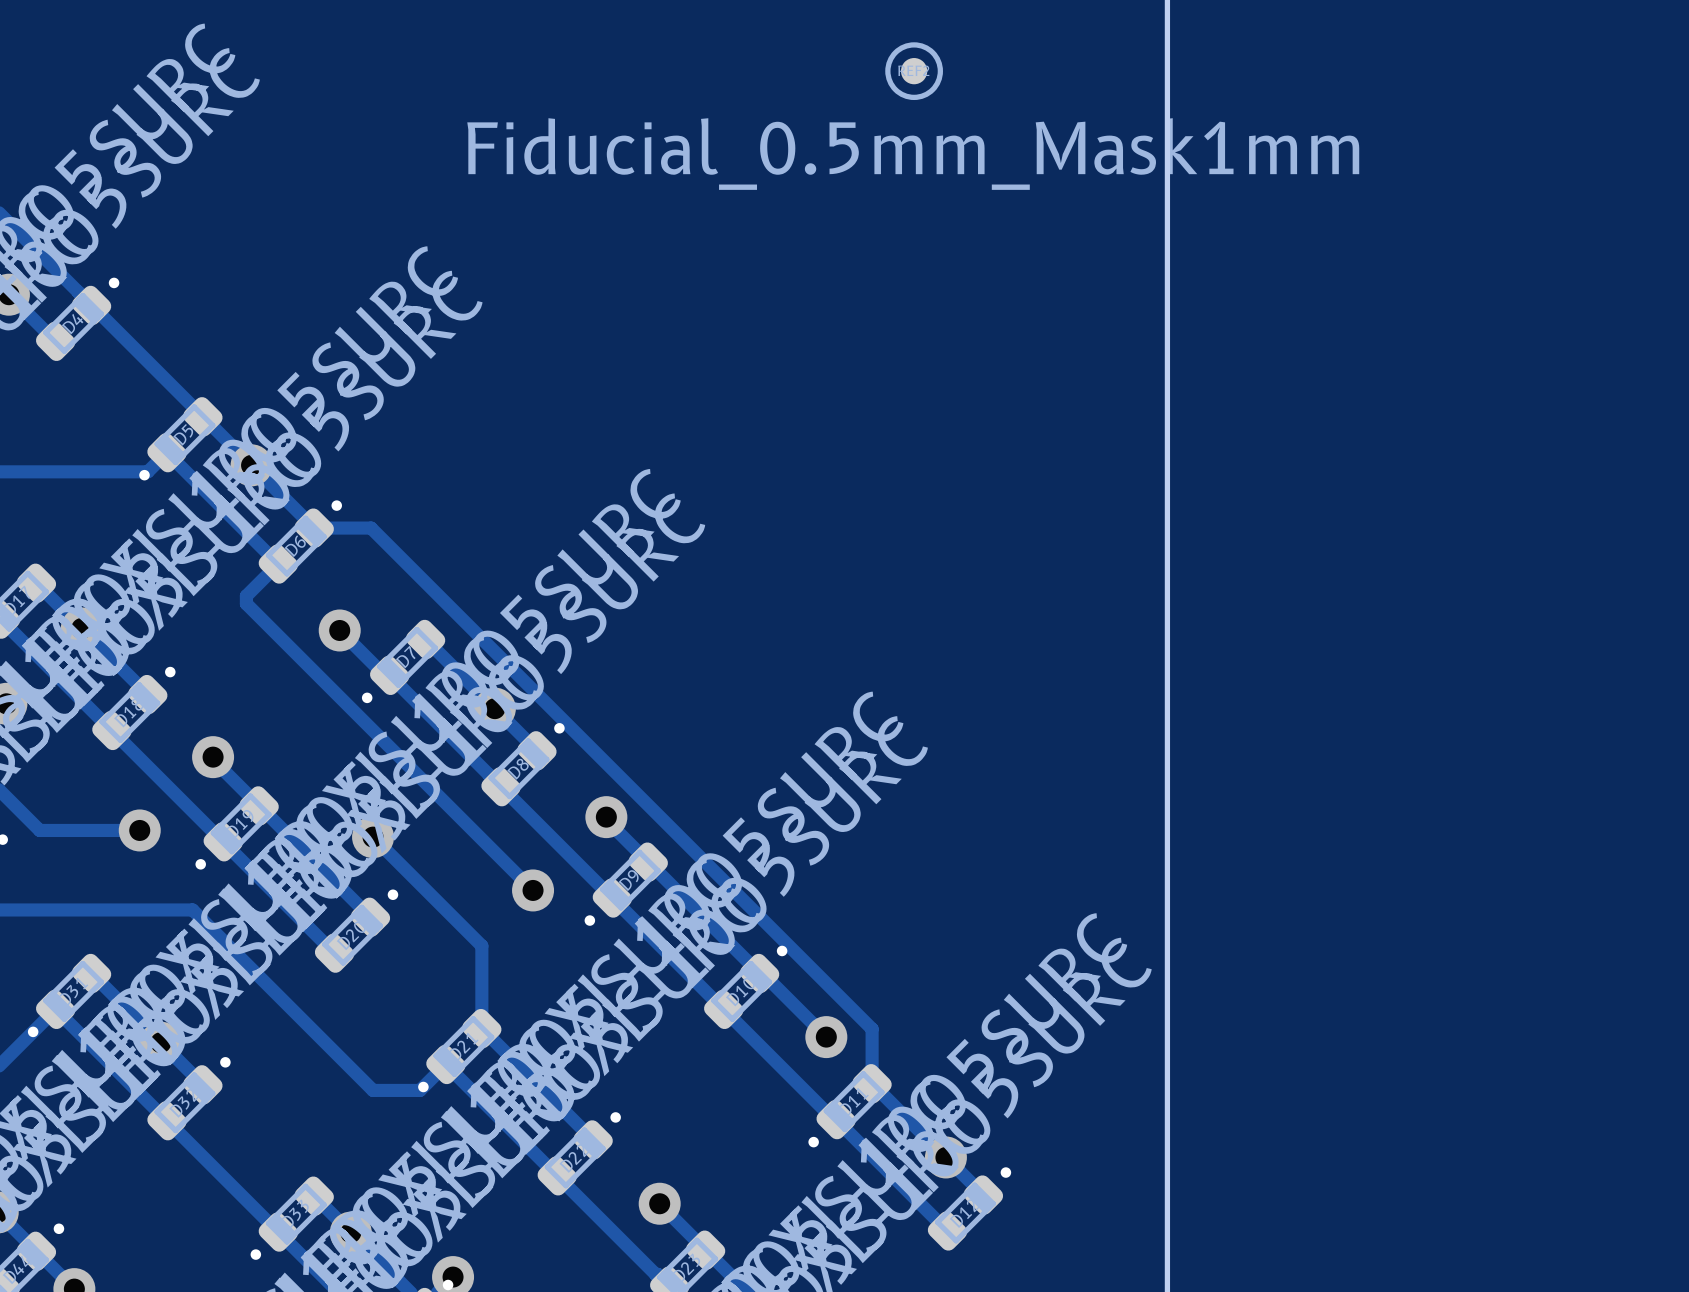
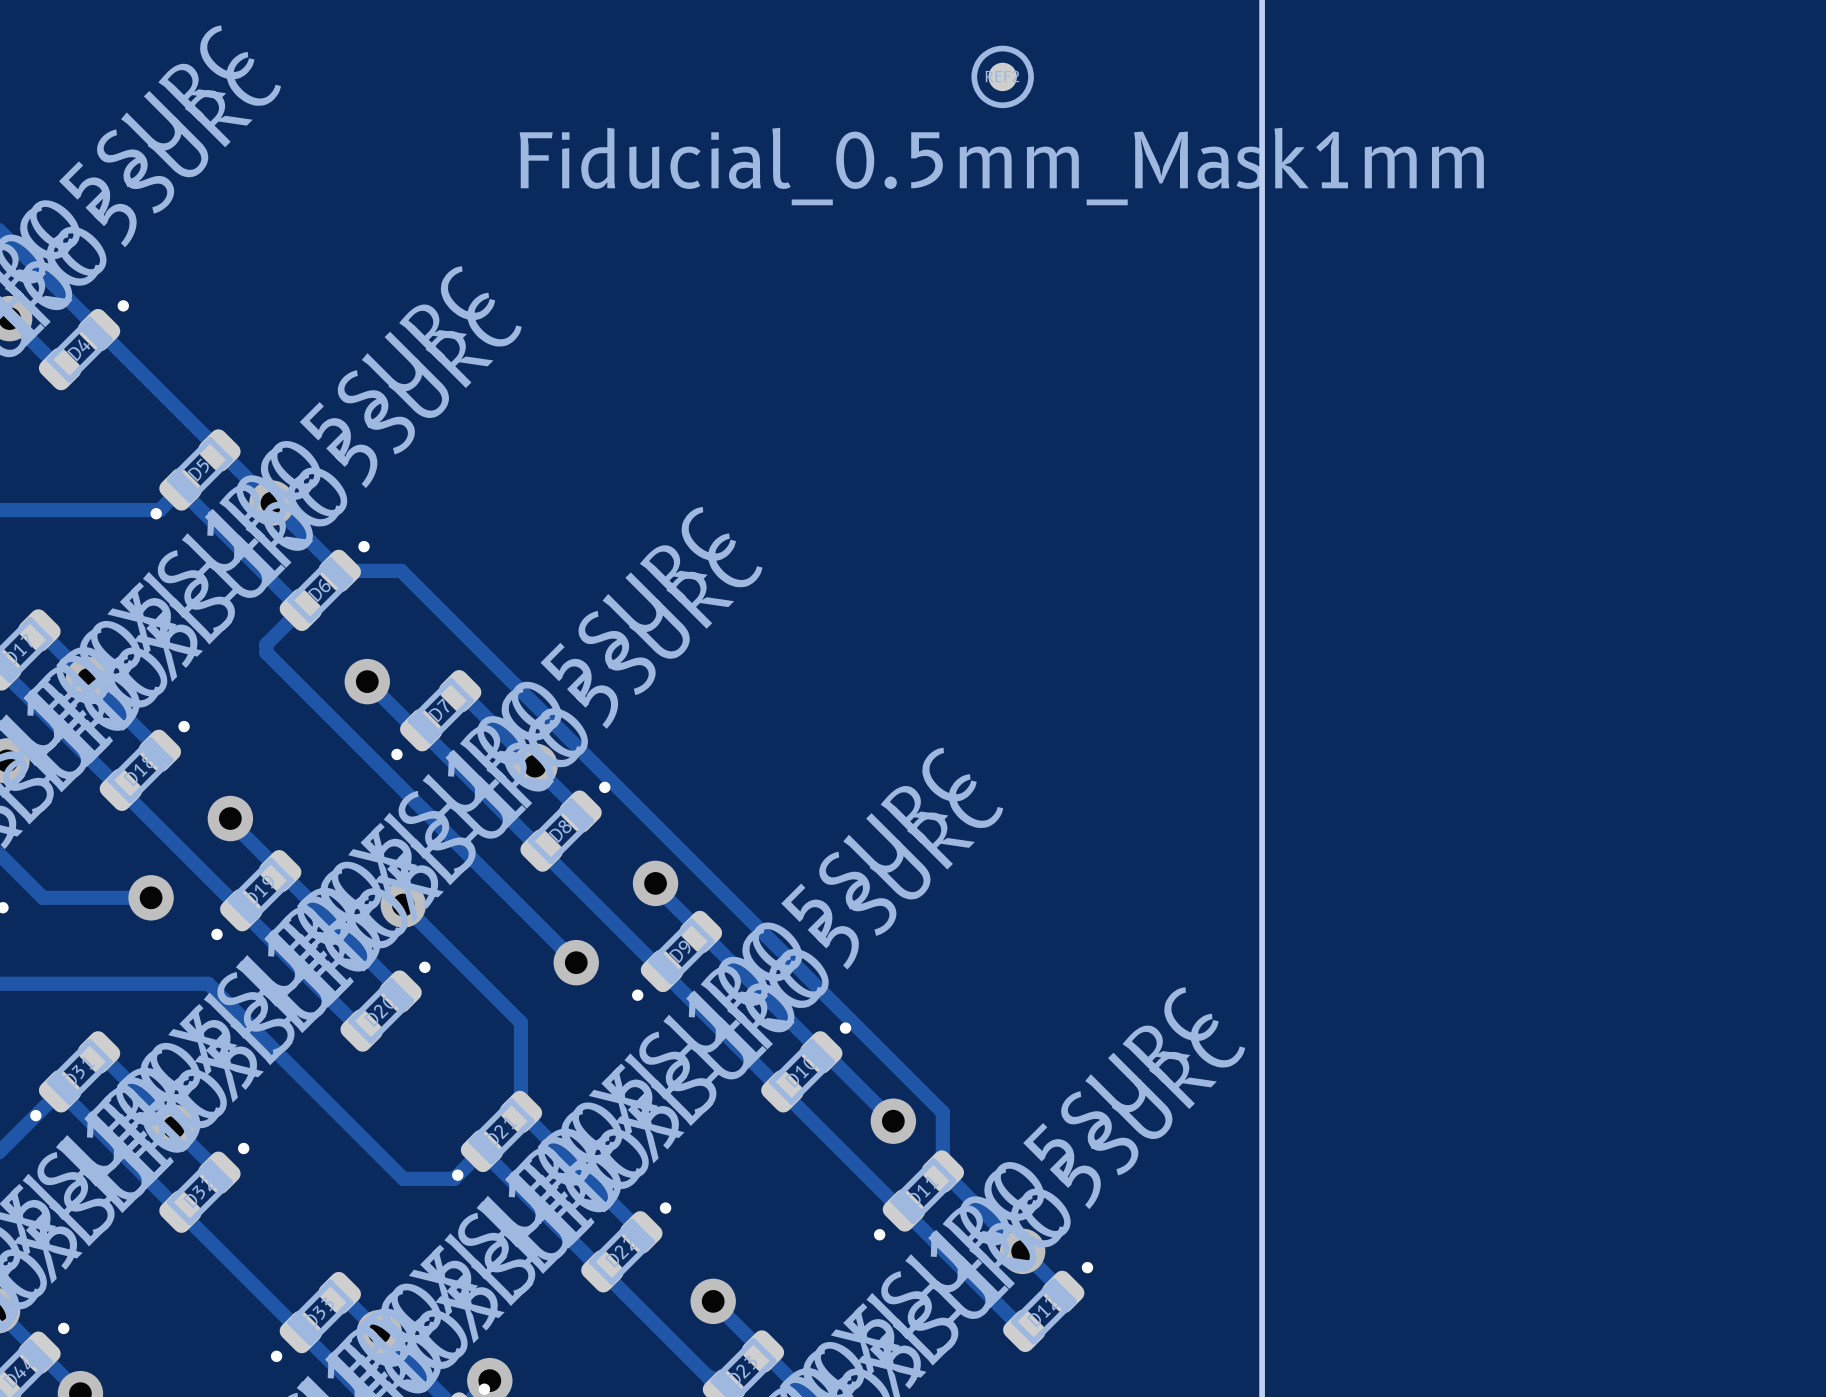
part position: (914, 71) -> (1002, 76)

